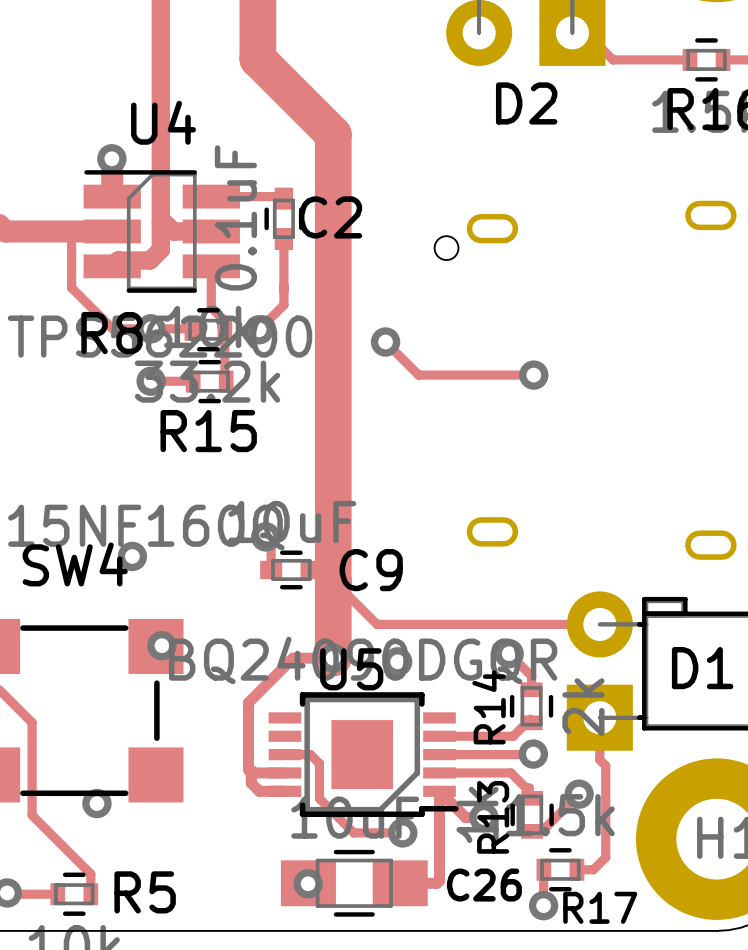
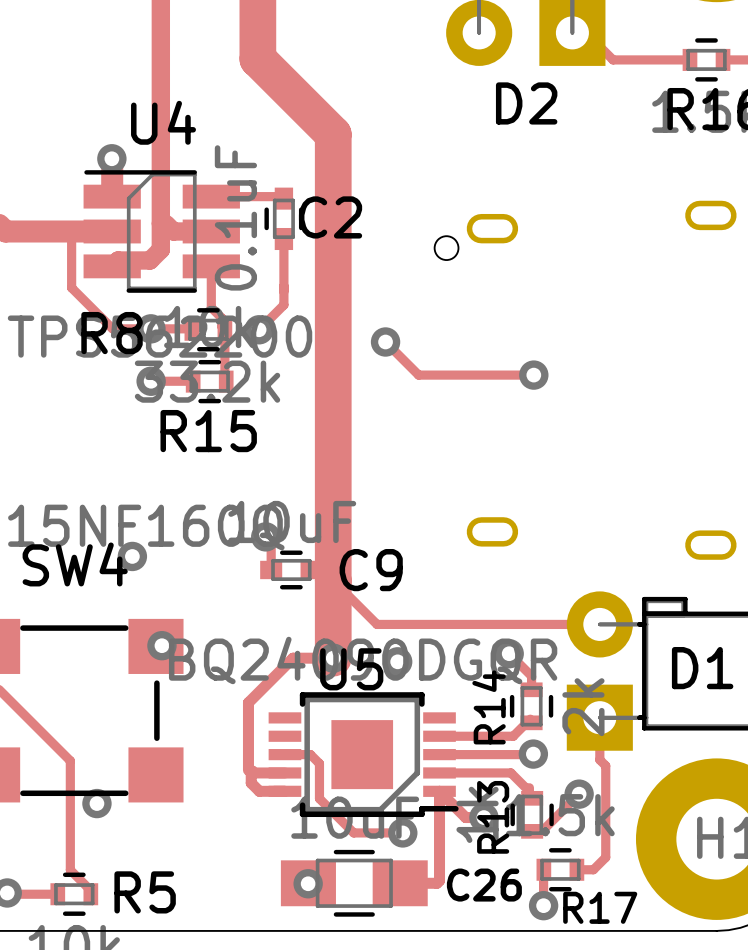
track: (32, 722) (32, 815) (90, 874) (90, 890) -> (32, 722) (70, 760) (70, 870) (90, 890)

